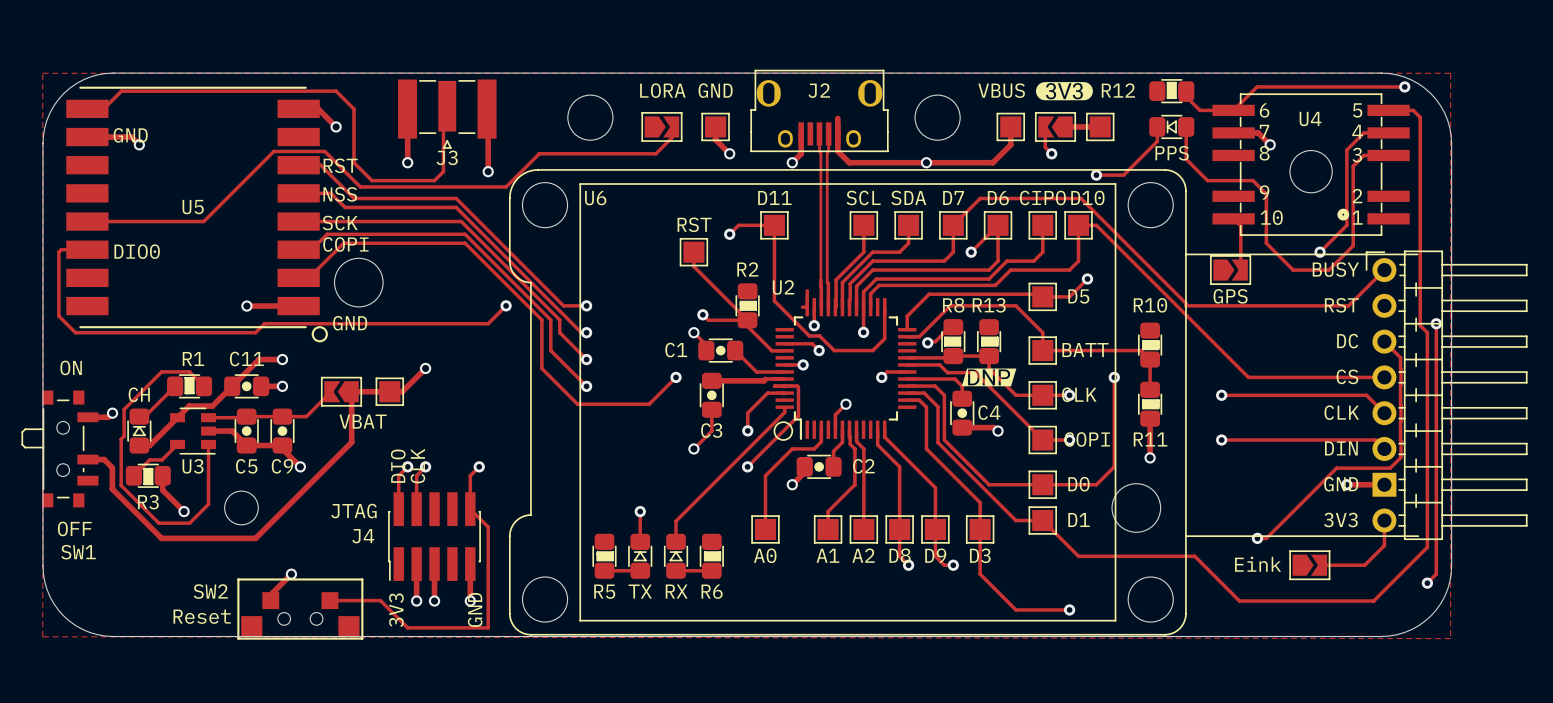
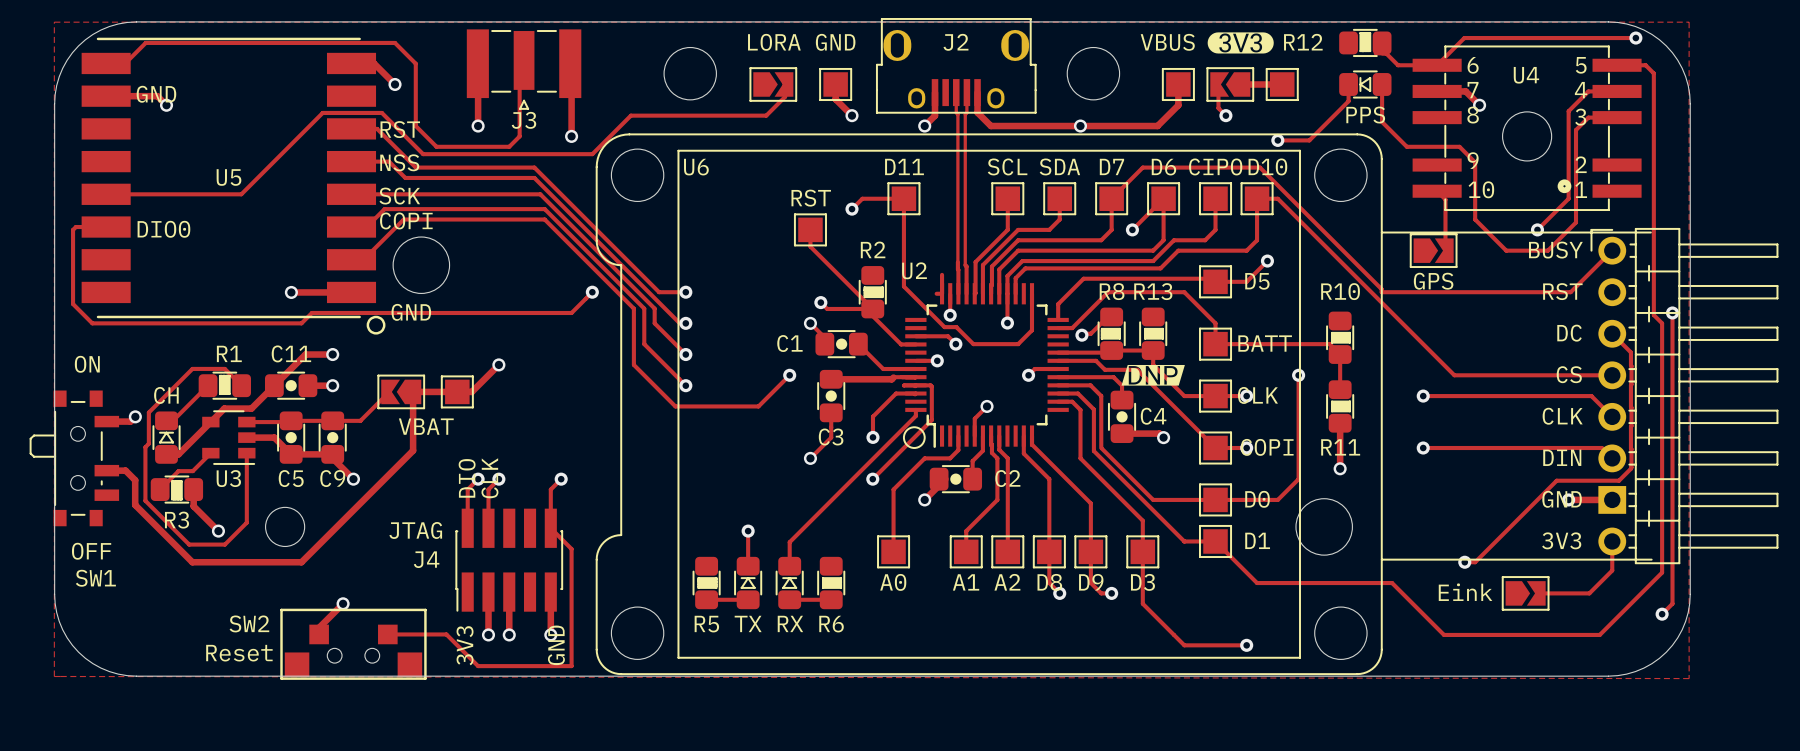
track: (837, 118) (837, 133) -> none

